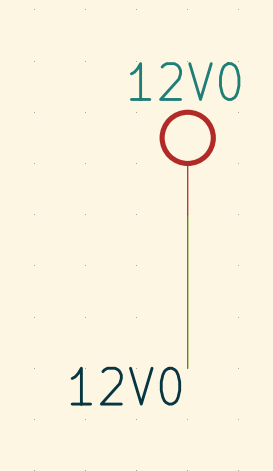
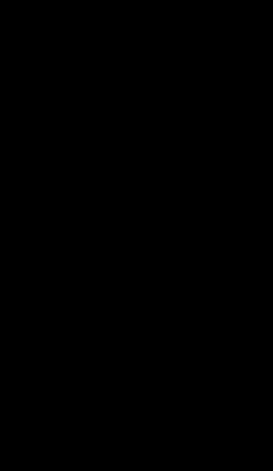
power symbol: 12V0 (187, 162) -> none
wire: (187, 214) (187, 368) -> none
label: 12V0 (125, 386) -> none

